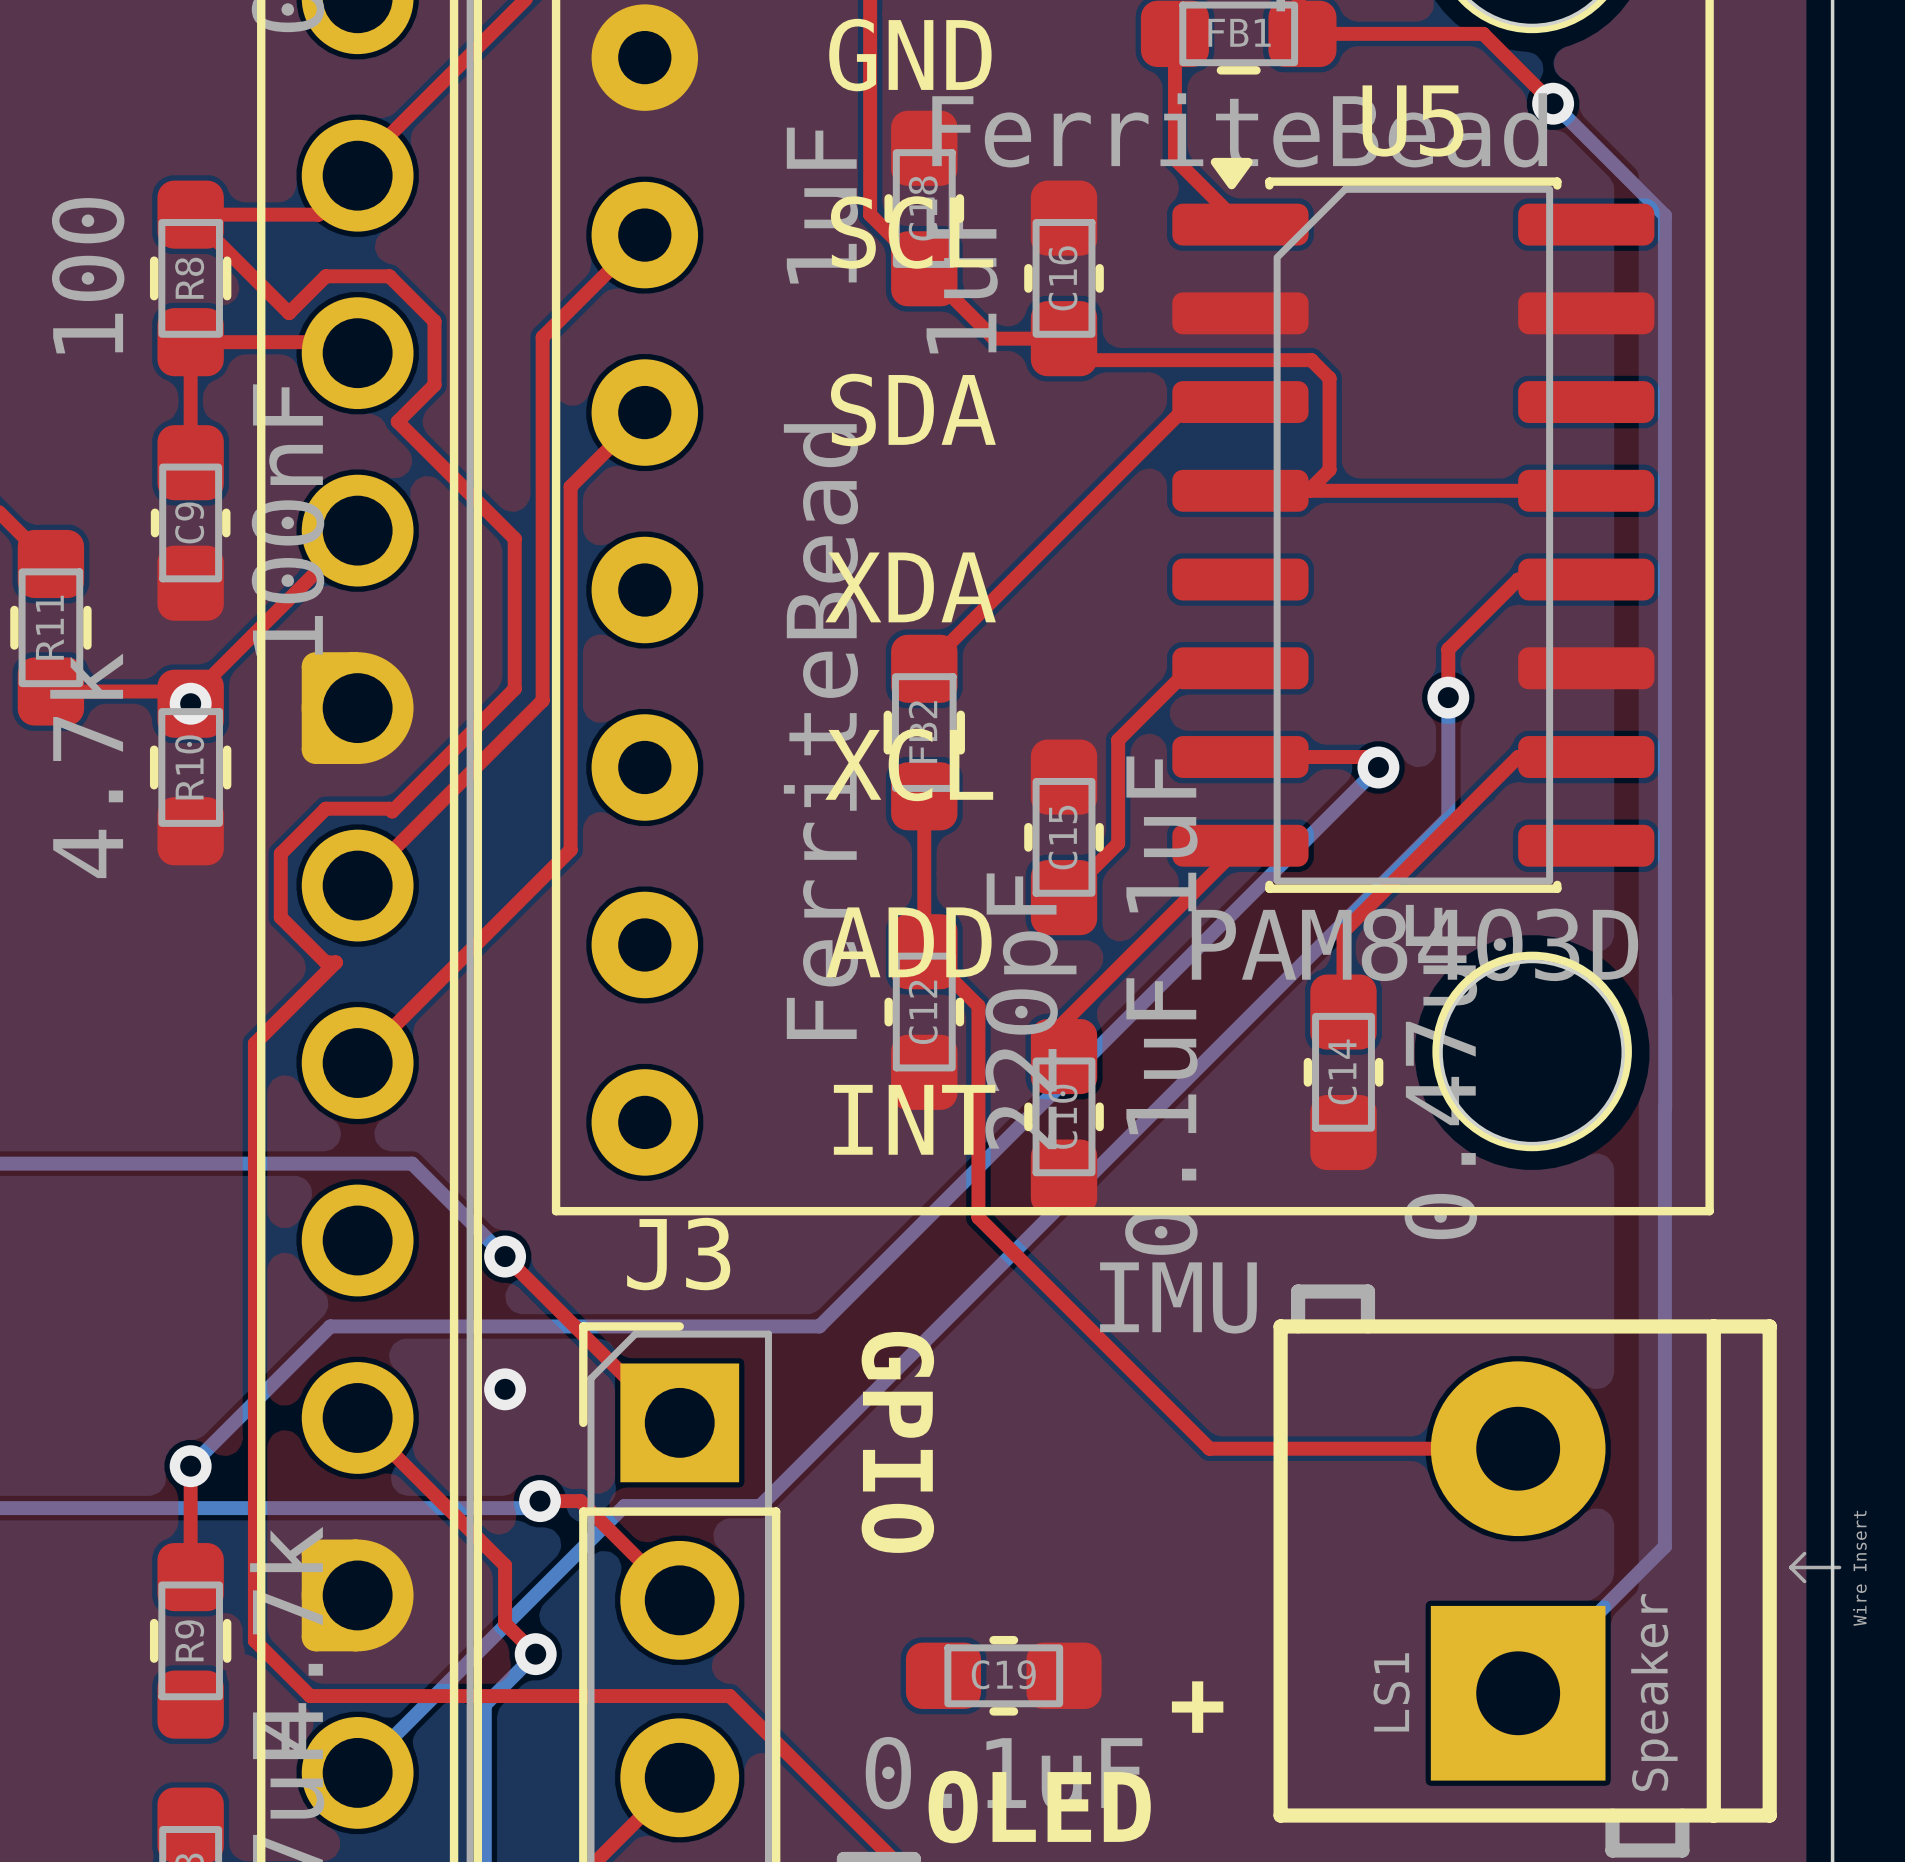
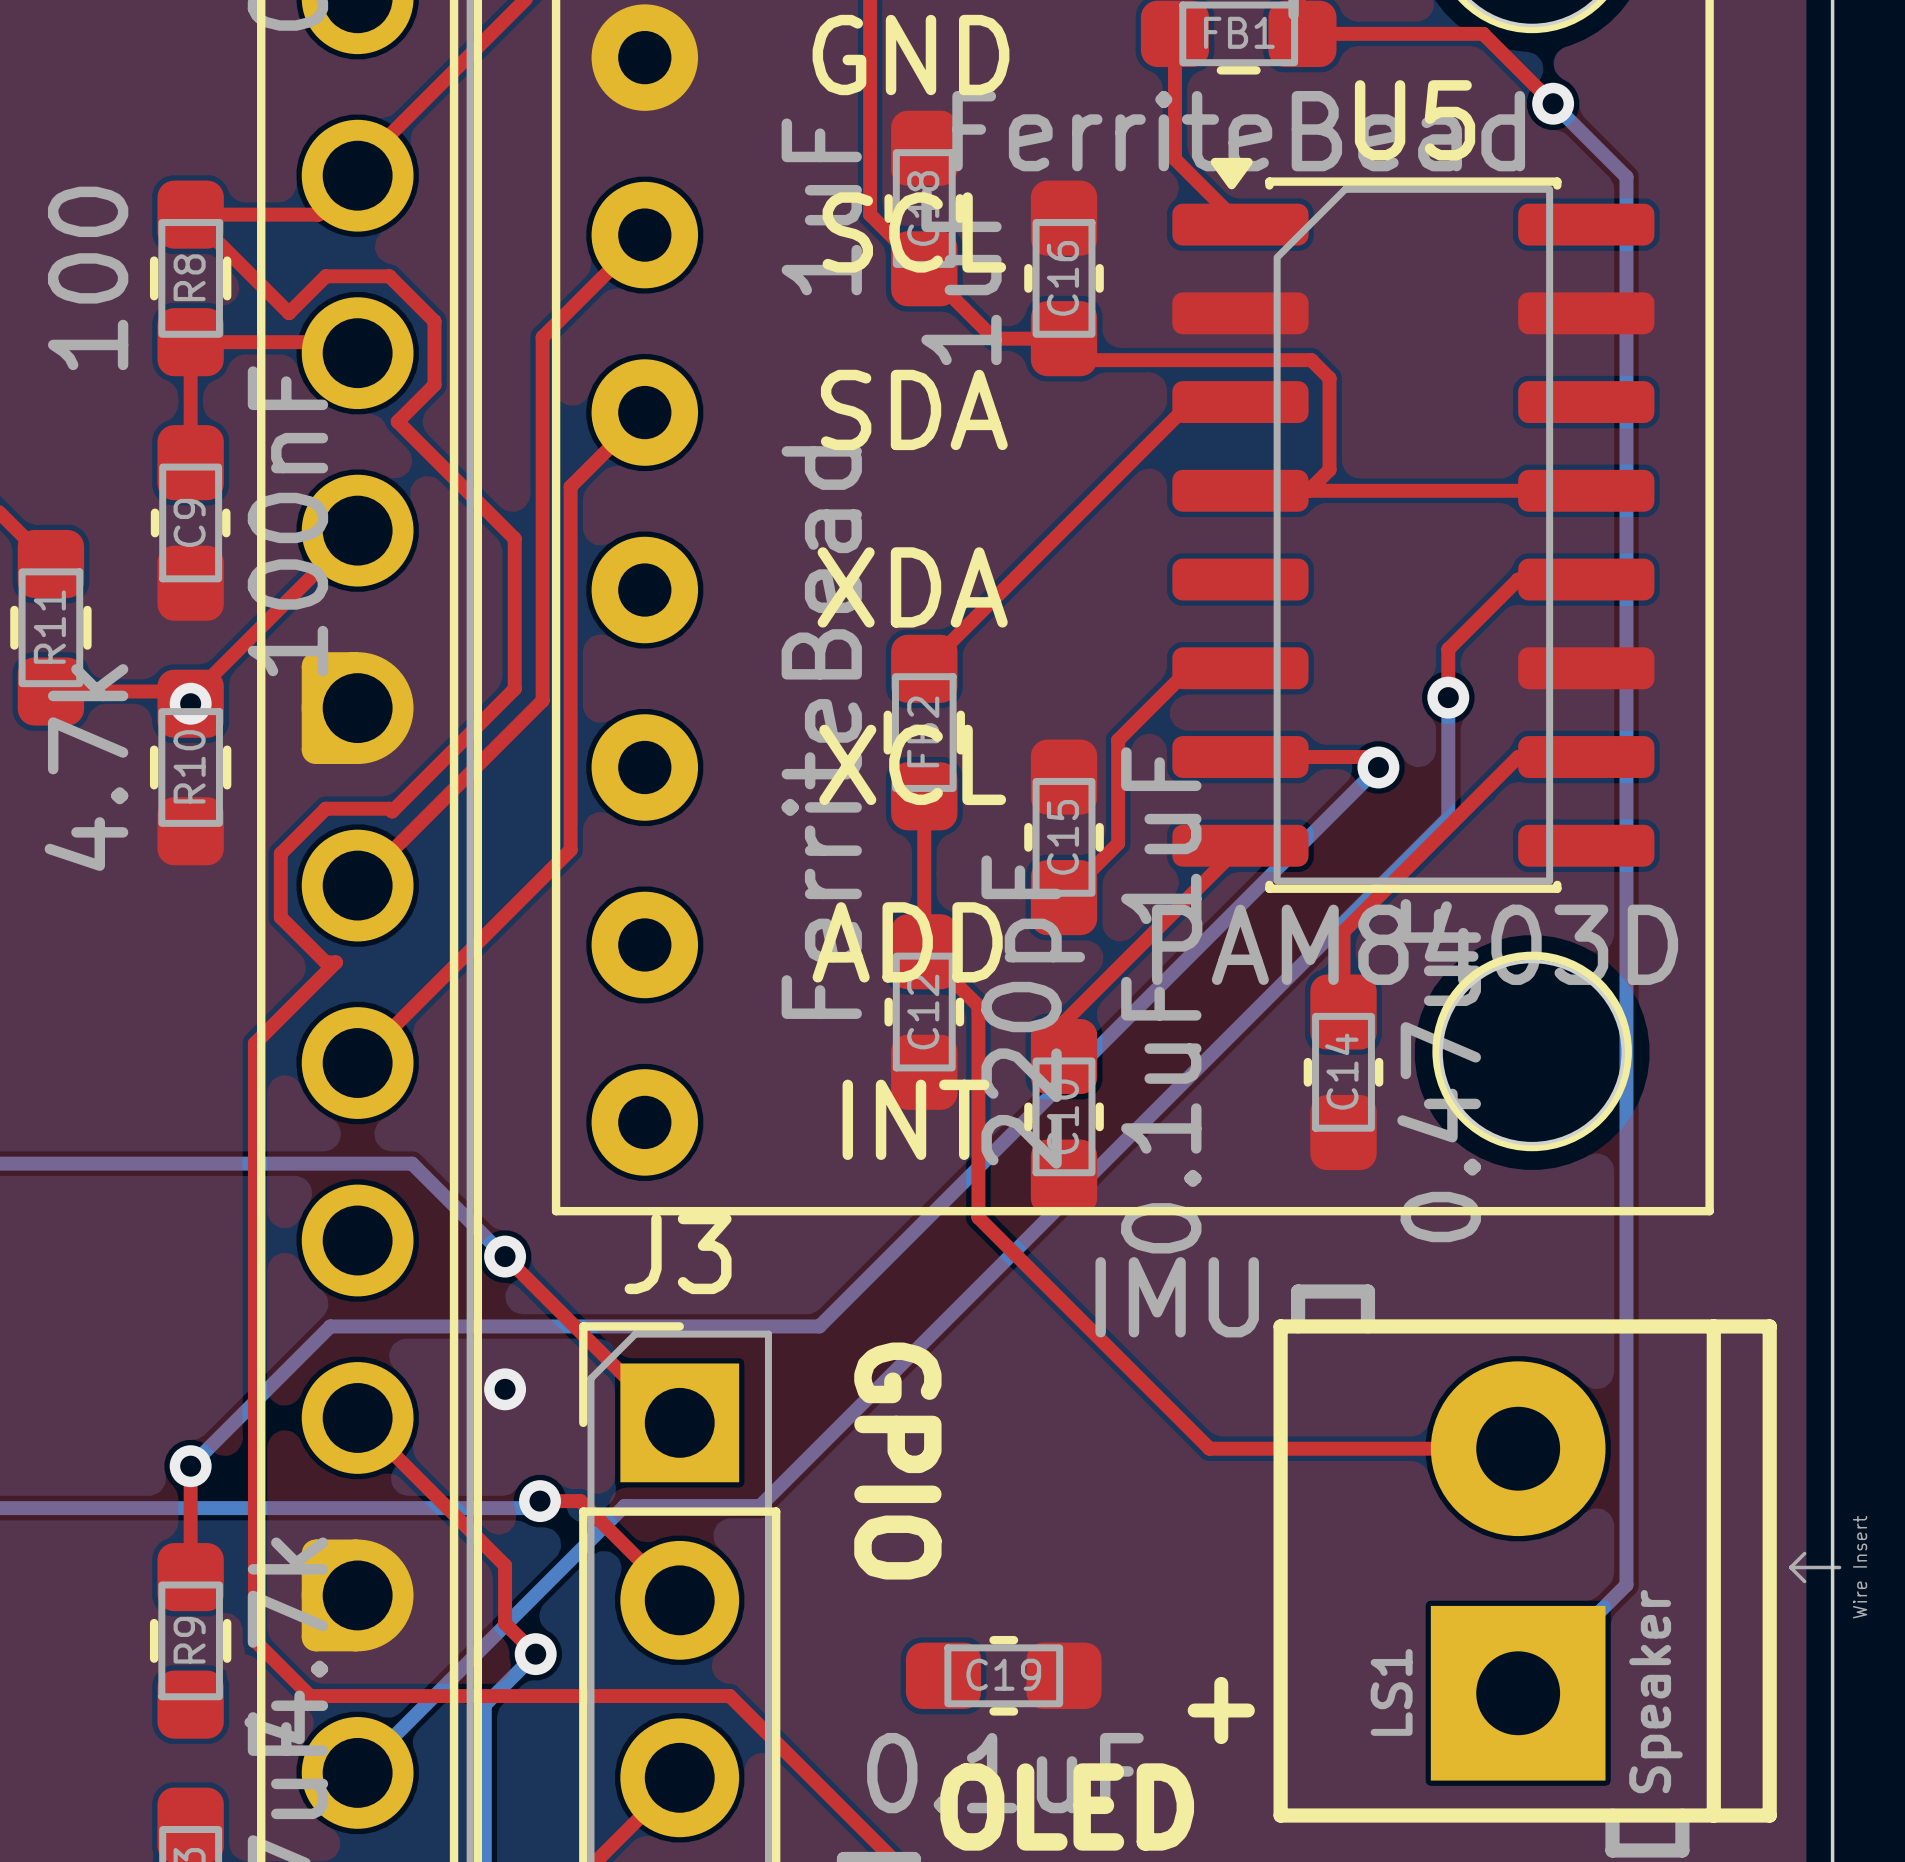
bottom track: (1626, 177) (1664, 215) (1664, 1546) (1626, 1584) -> (1626, 177) (1626, 1584)

